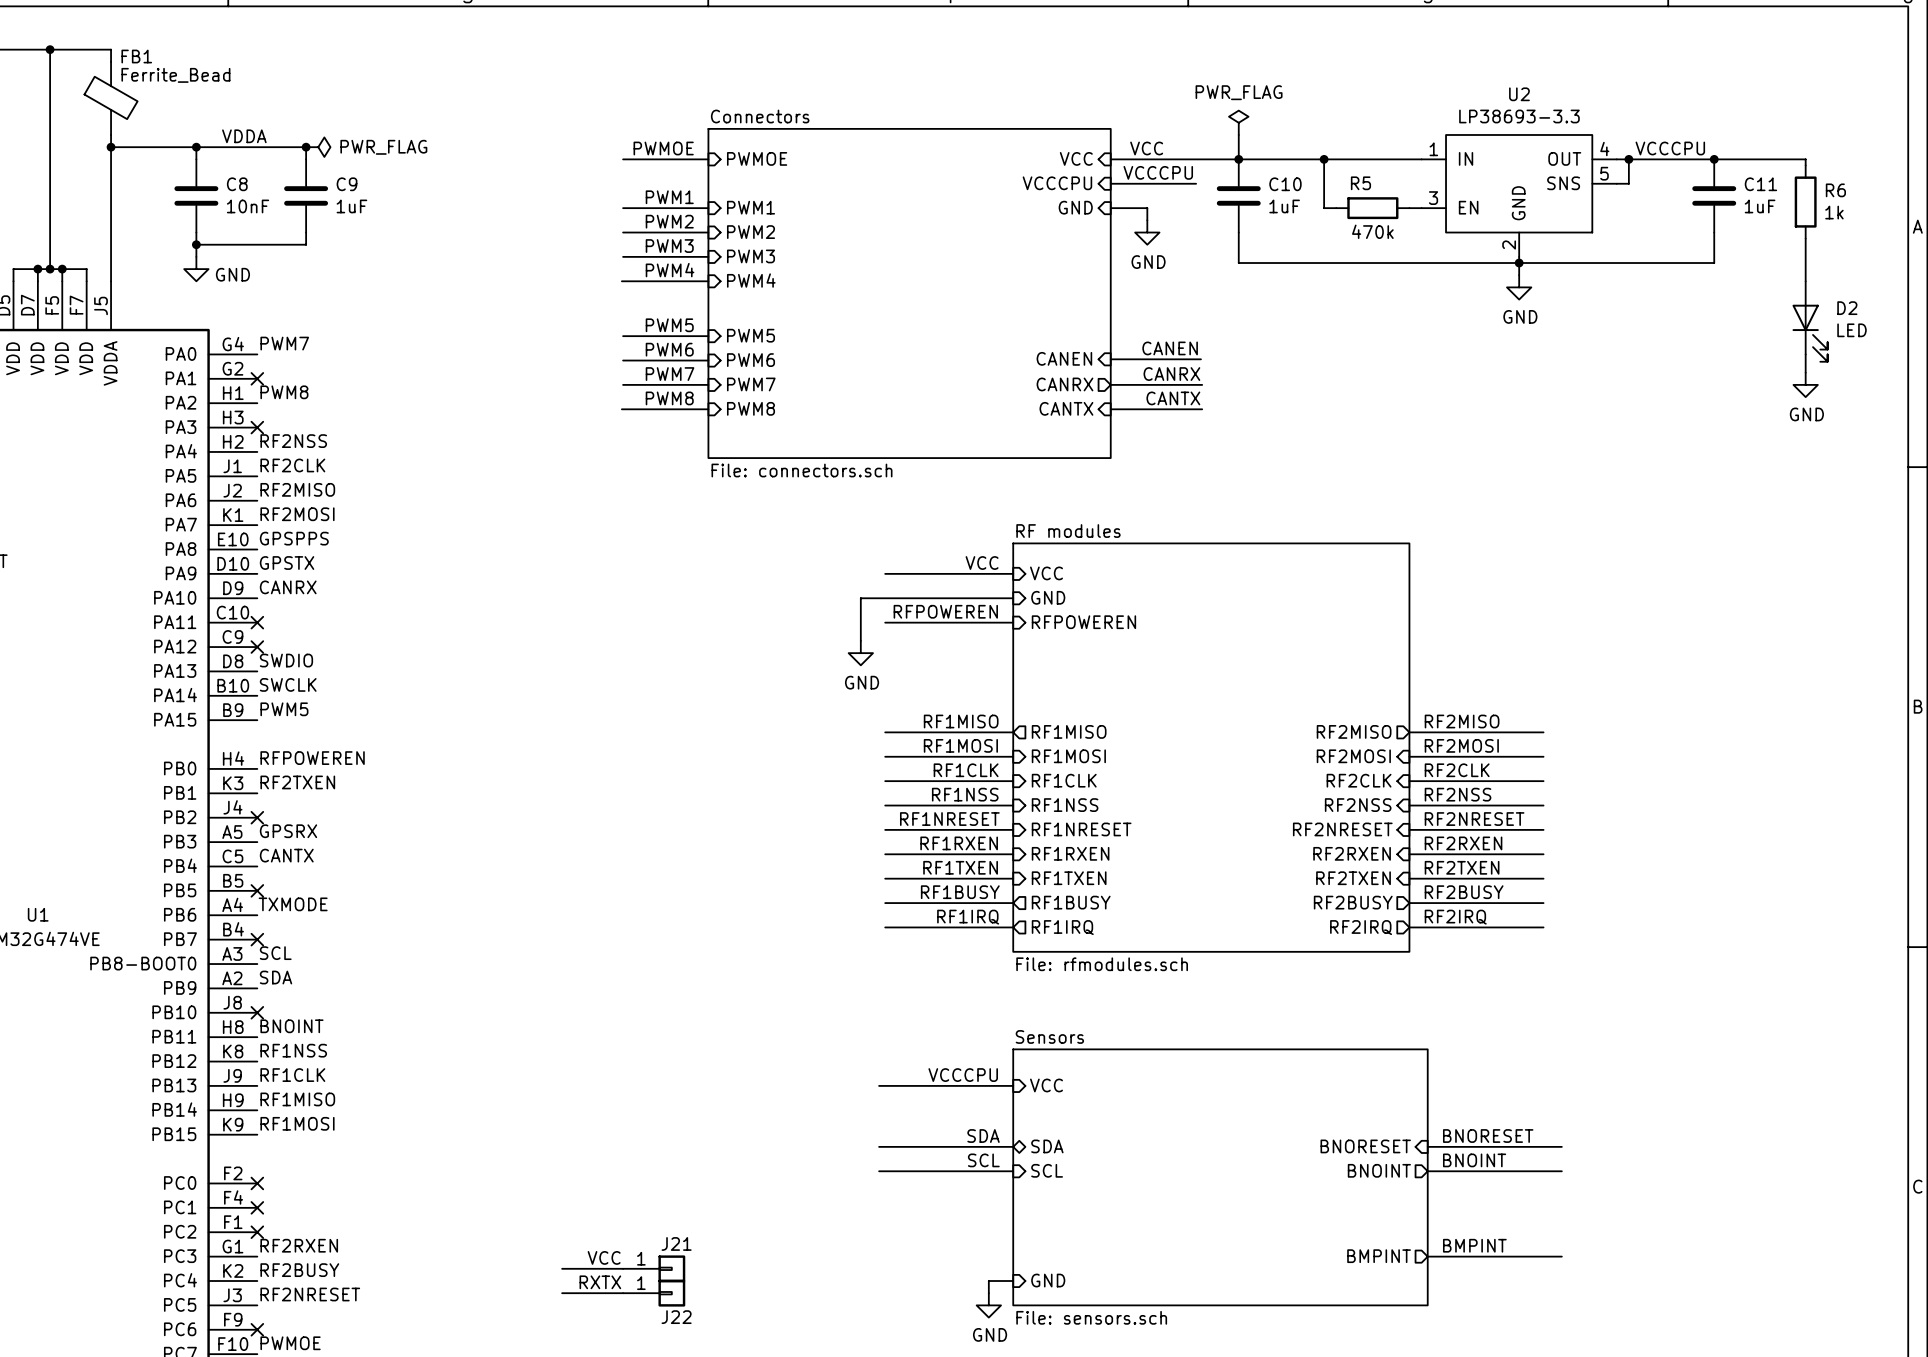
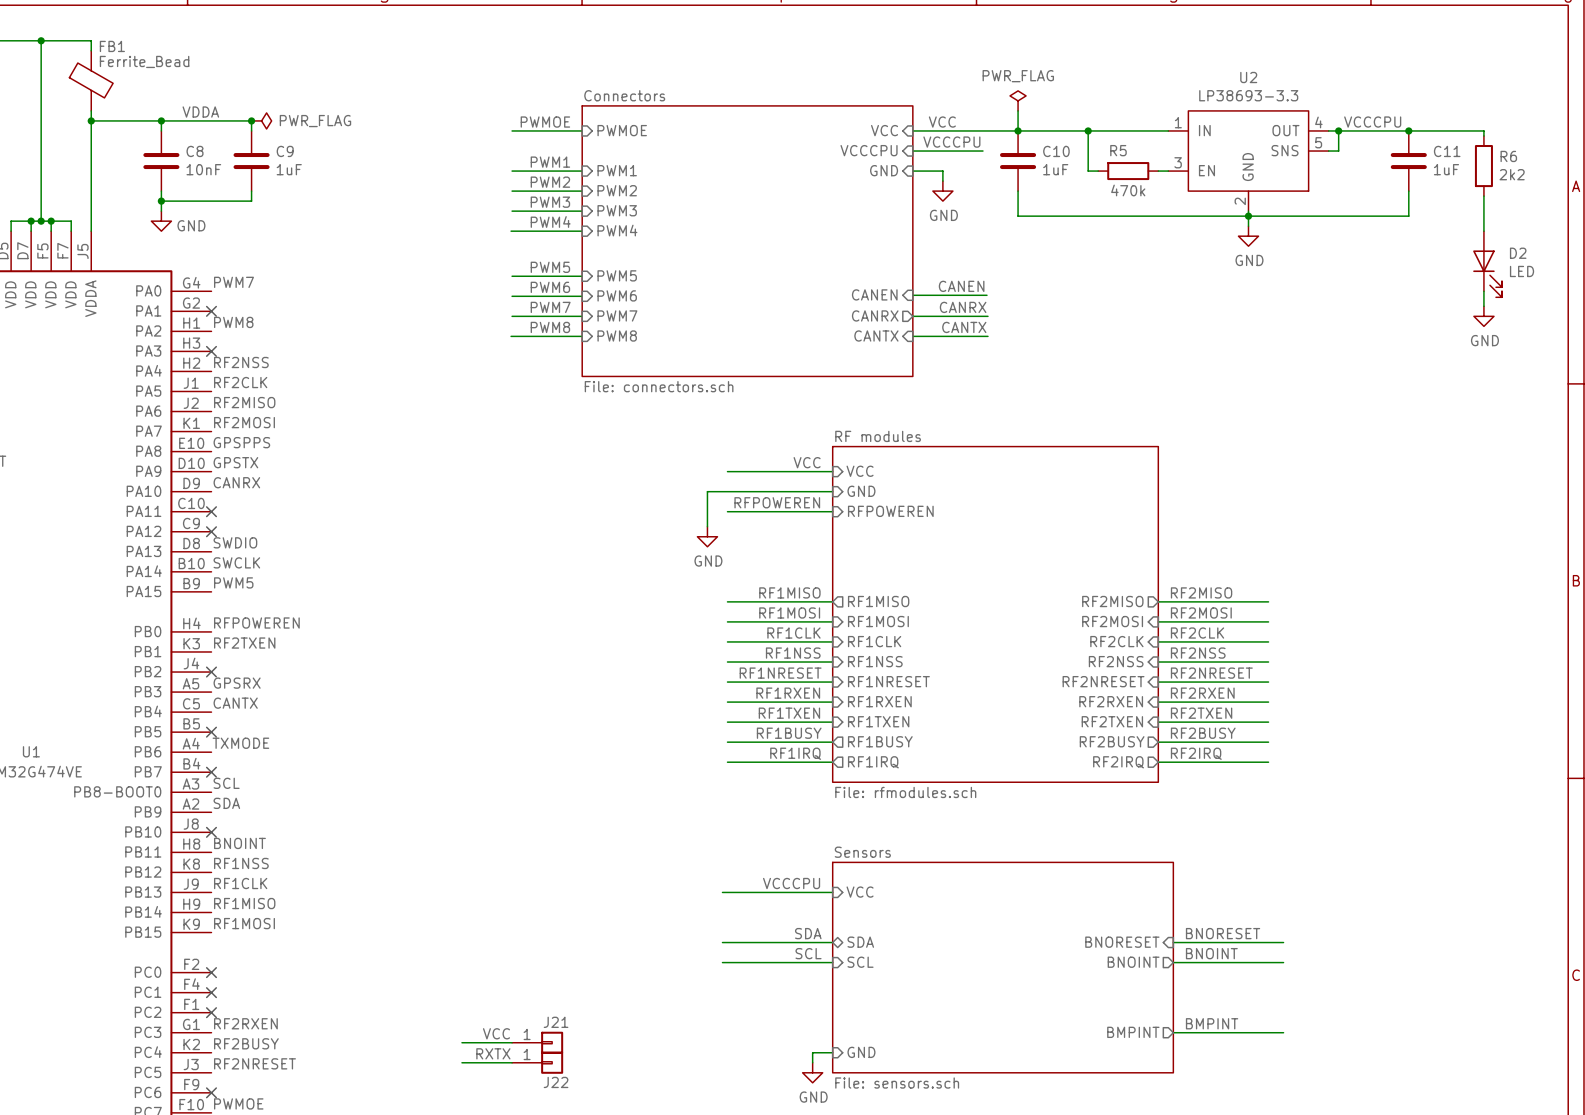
R6 value: 1k (1834, 212) -> 2k2 (1512, 174)

